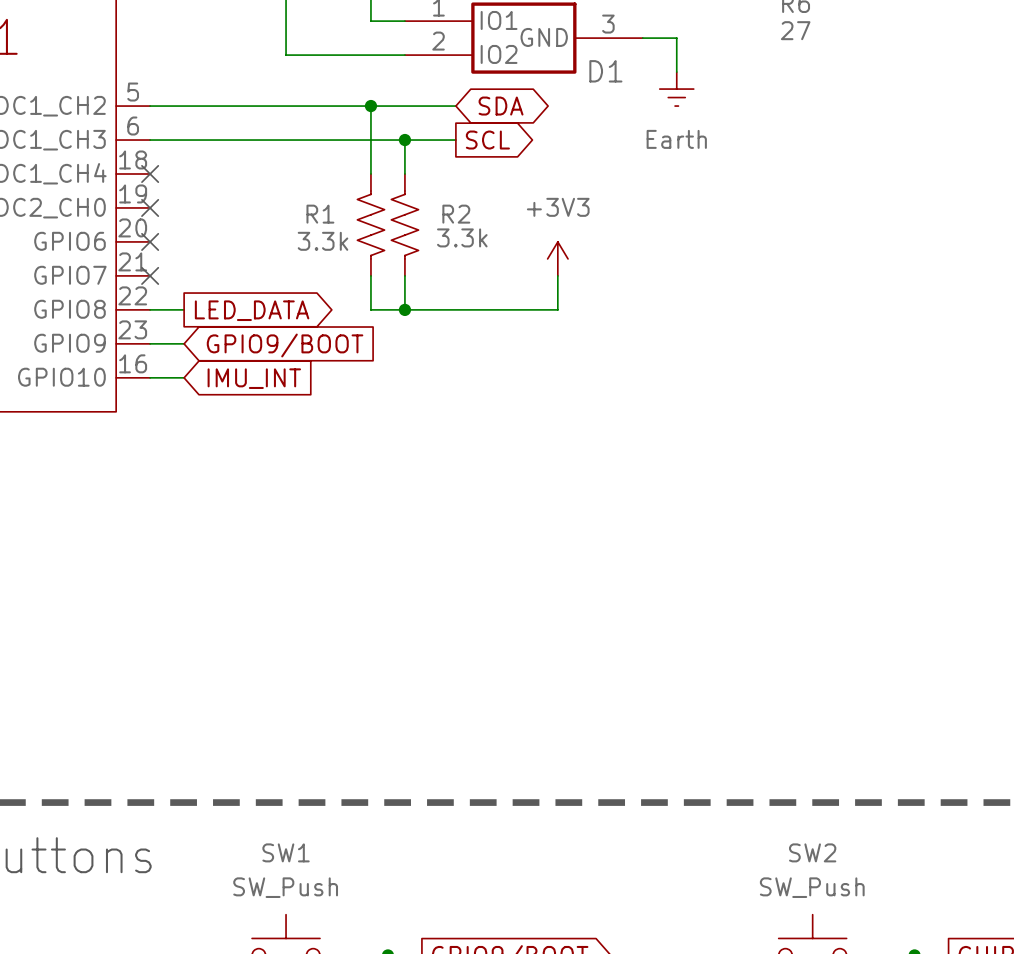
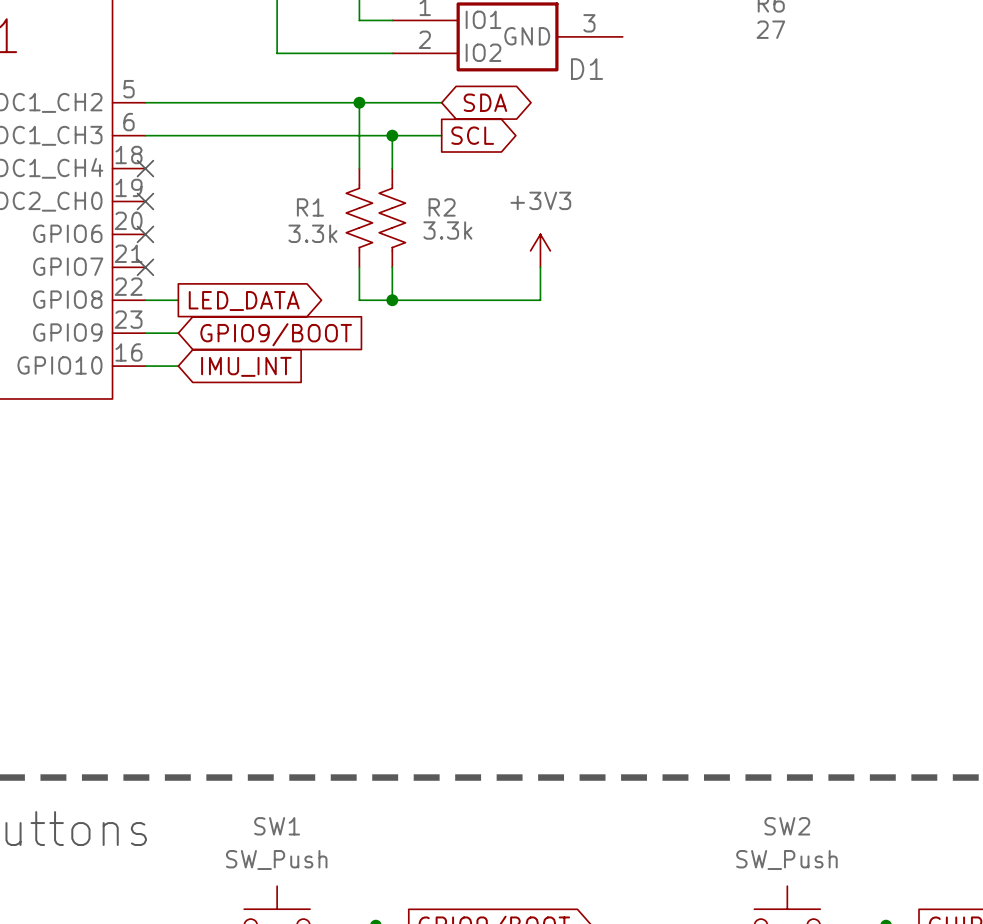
wire: (642, 38) (676, 38) (676, 72) -> none
power symbol: Earth (676, 89) -> none

